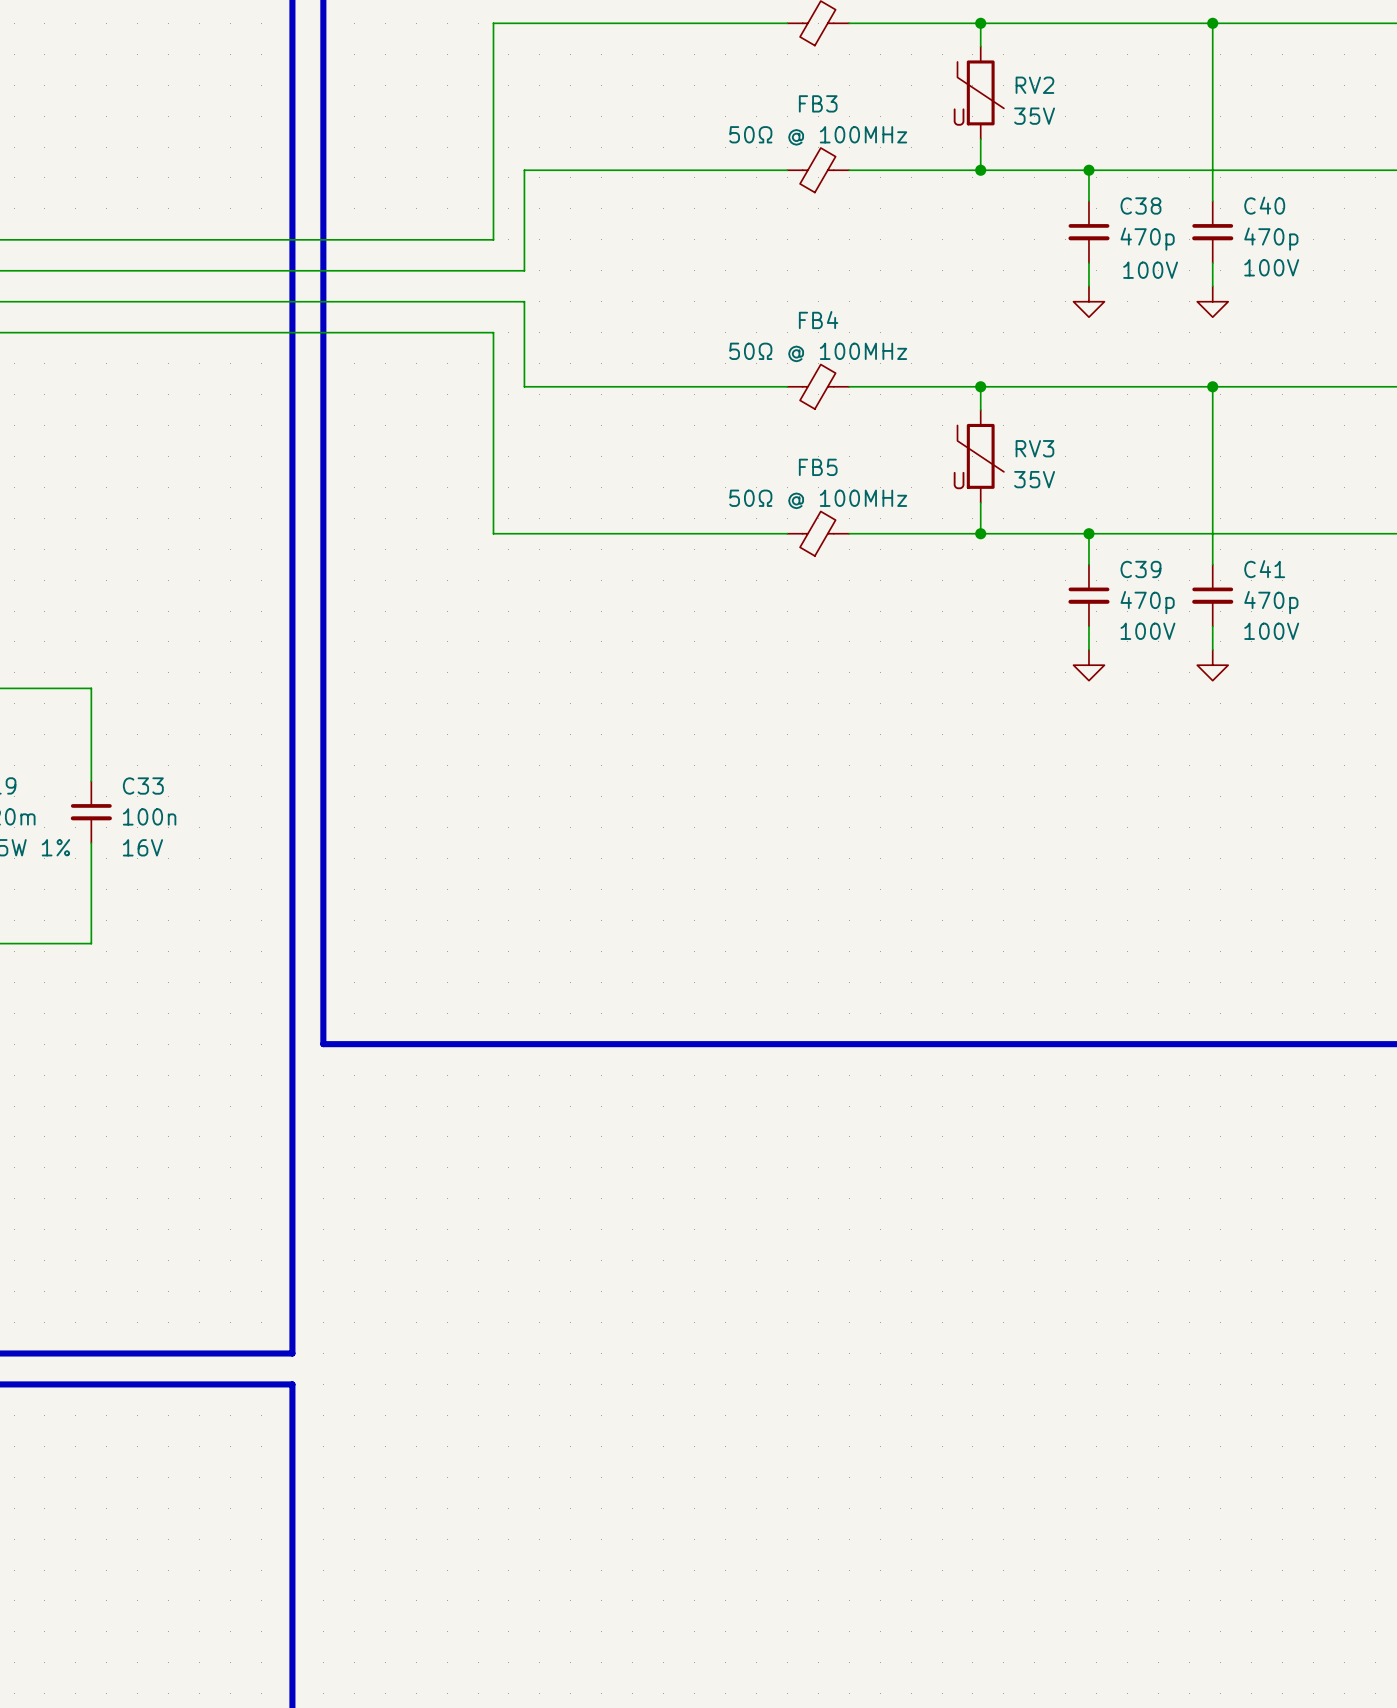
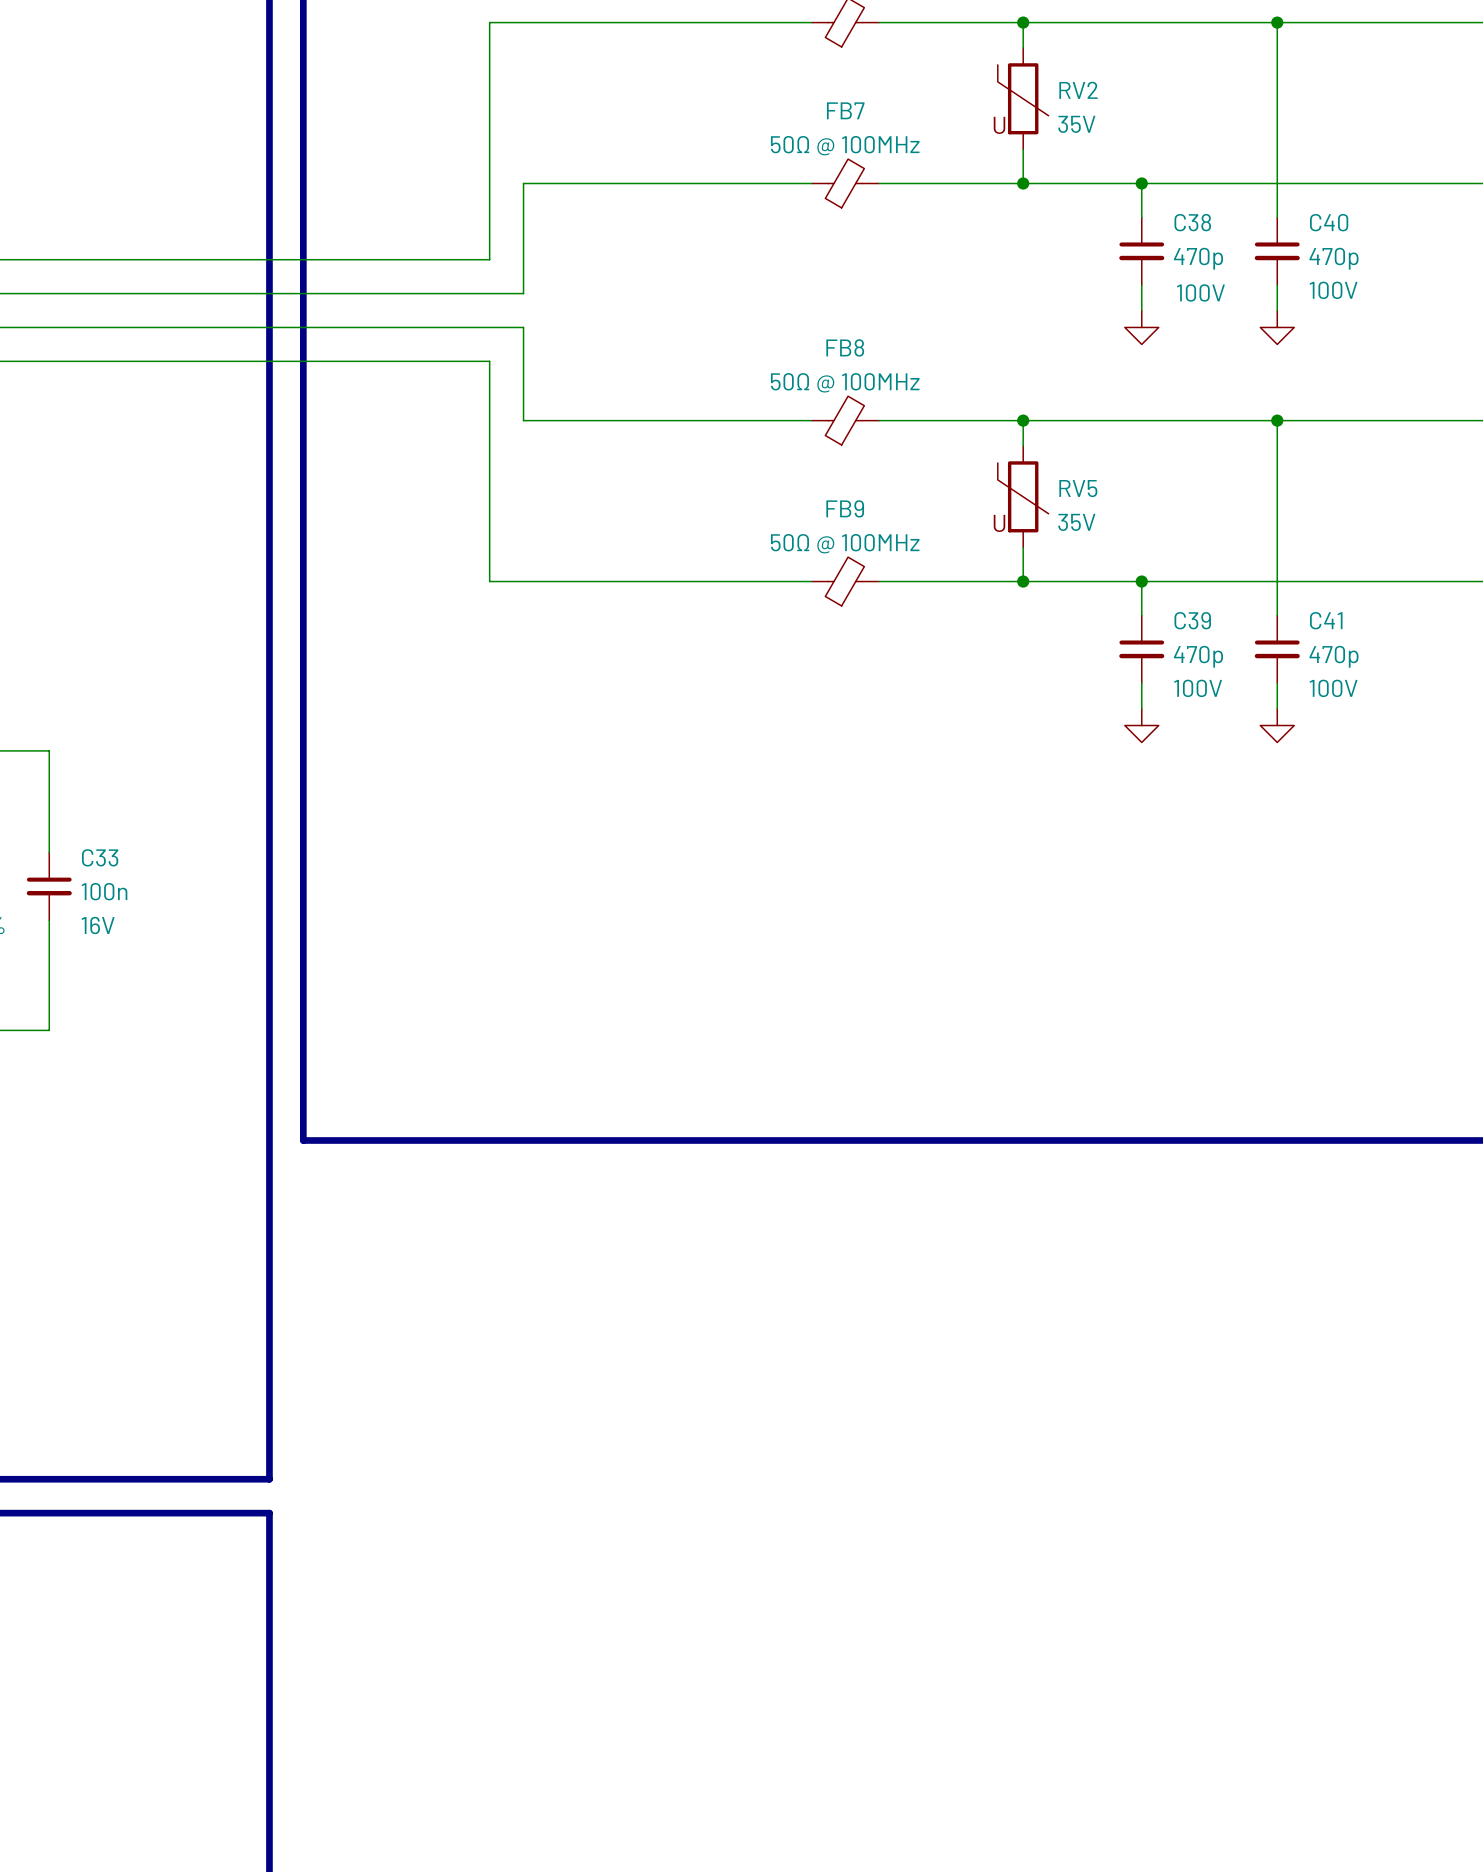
FB3 name: FB3 (818, 103) -> FB7 (845, 110)
FB4 name: FB4 (818, 320) -> FB8 (845, 347)
RV3 name: RV3 (1034, 448) -> RV5 (1078, 488)
FB5 name: FB5 (818, 467) -> FB9 (845, 508)

